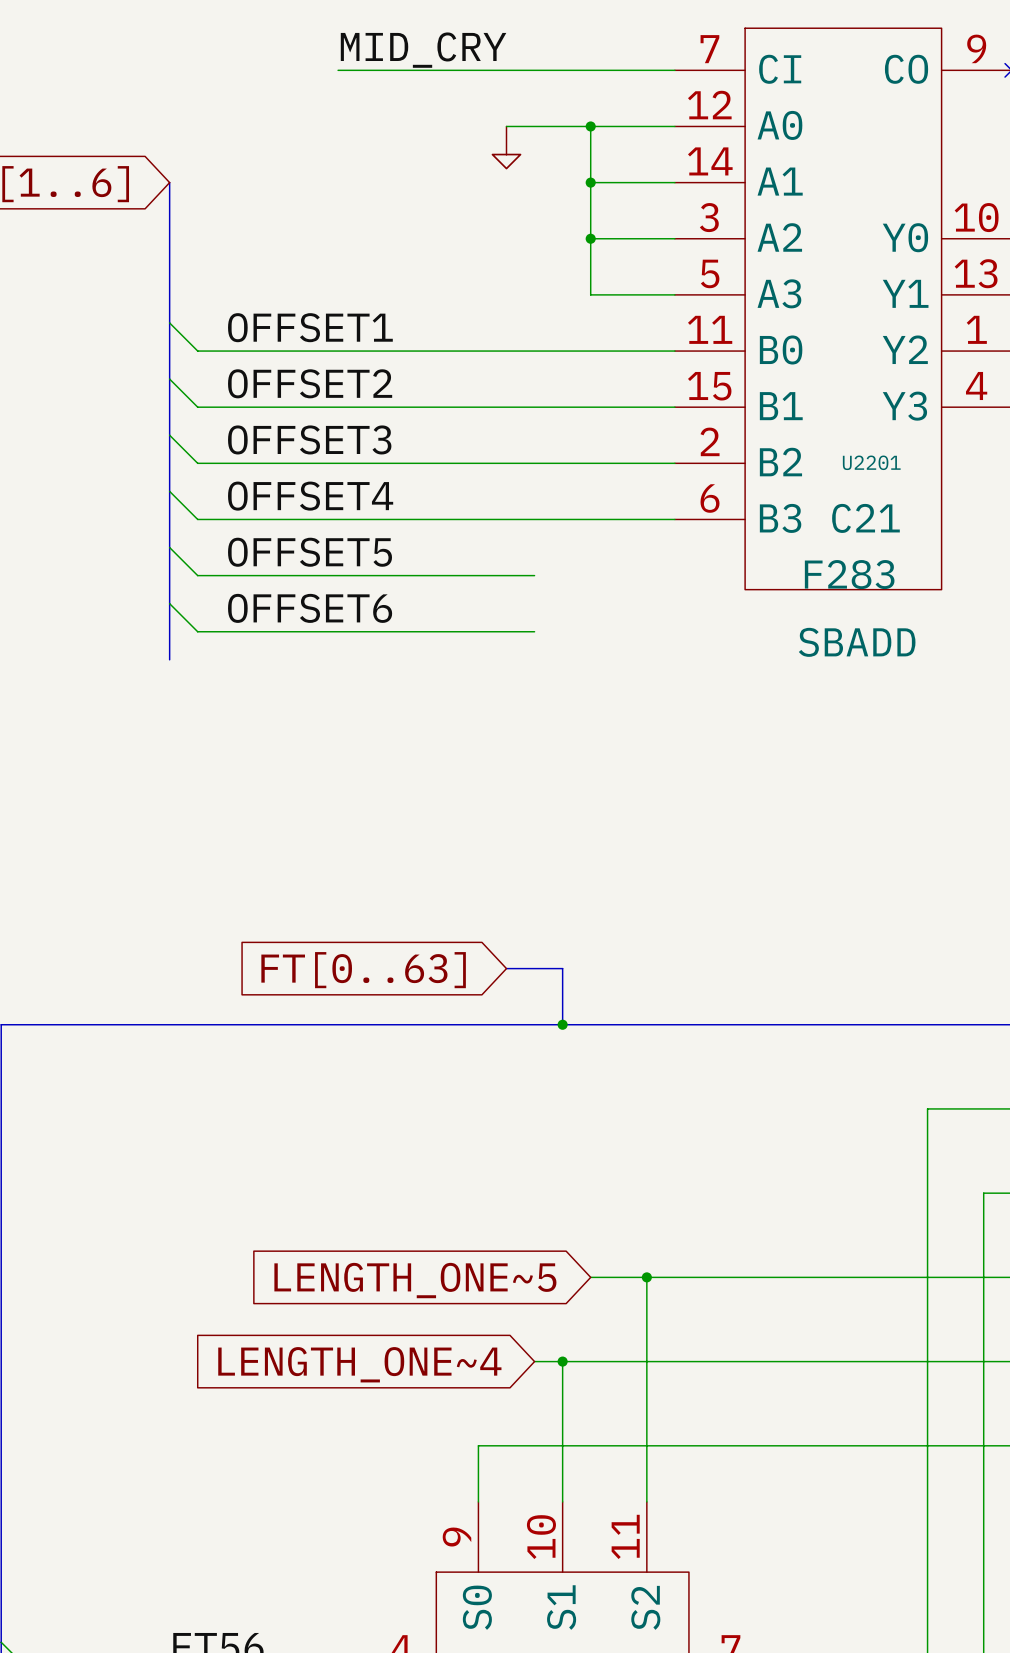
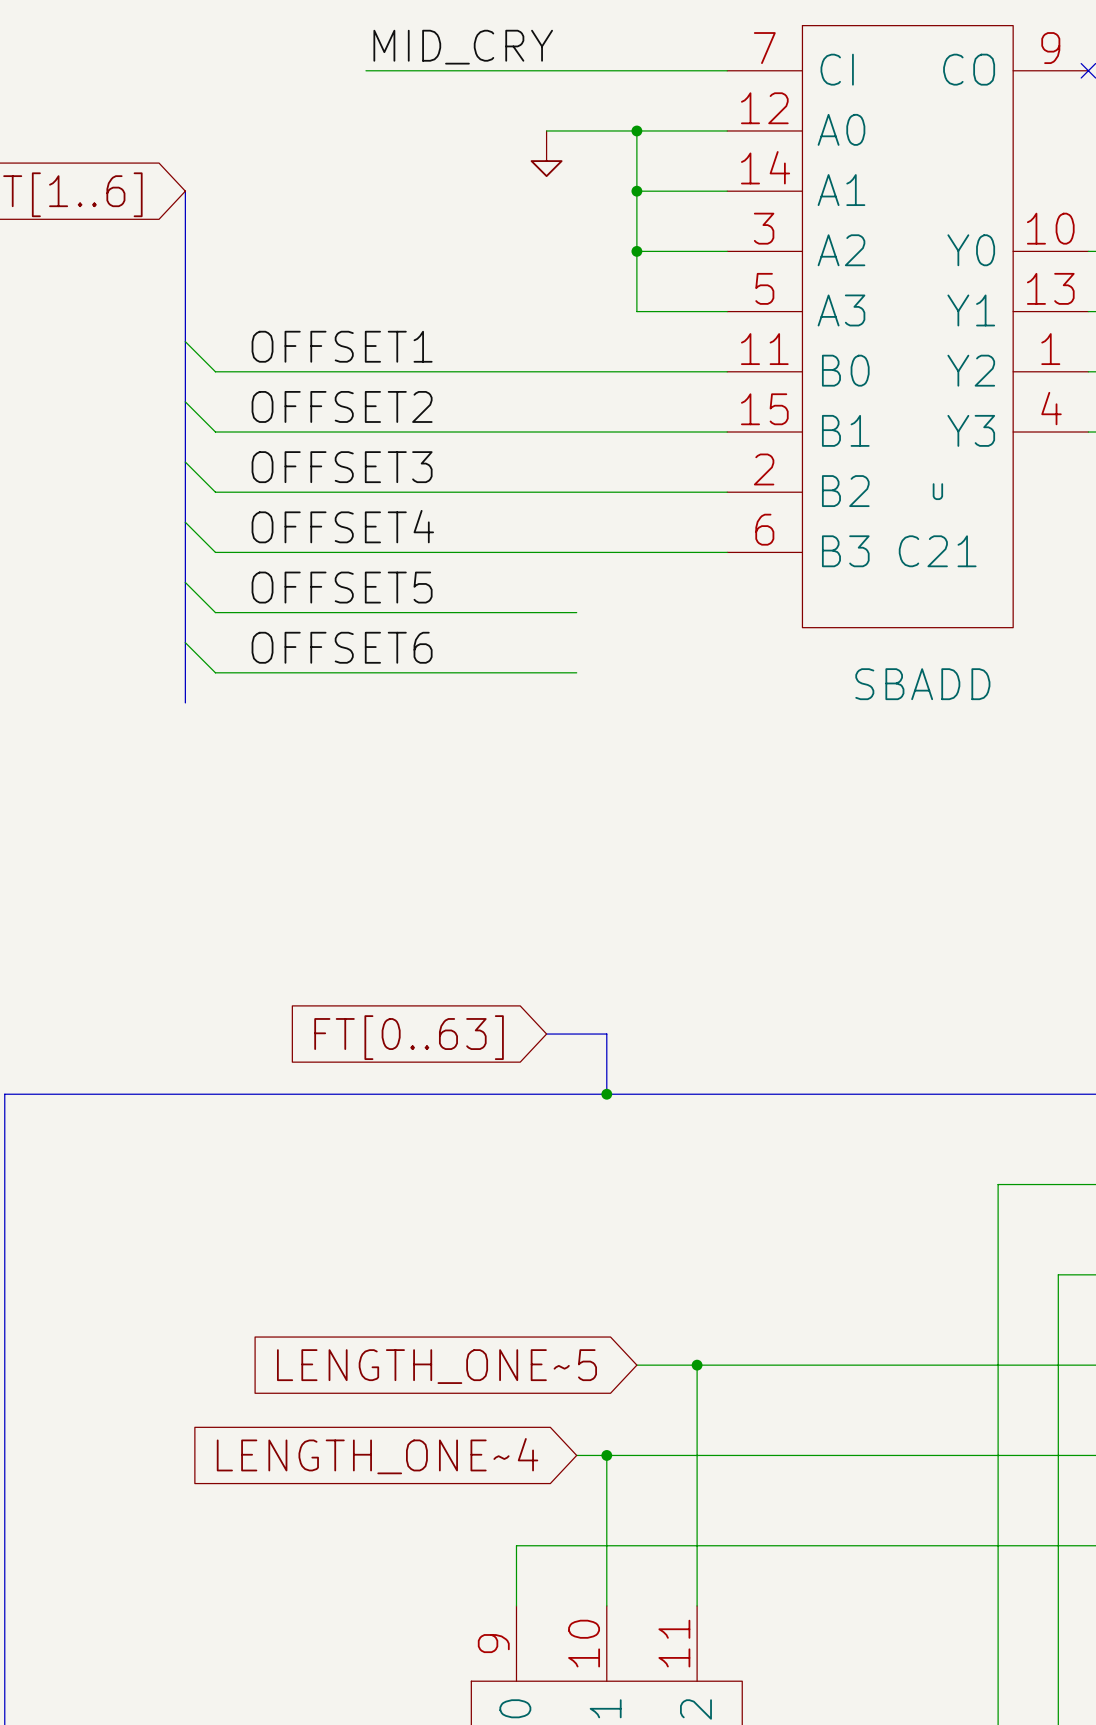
U2201 name: U2201 (871, 462) -> U (937, 491)
U2201 value: F283 (849, 574) -> none

